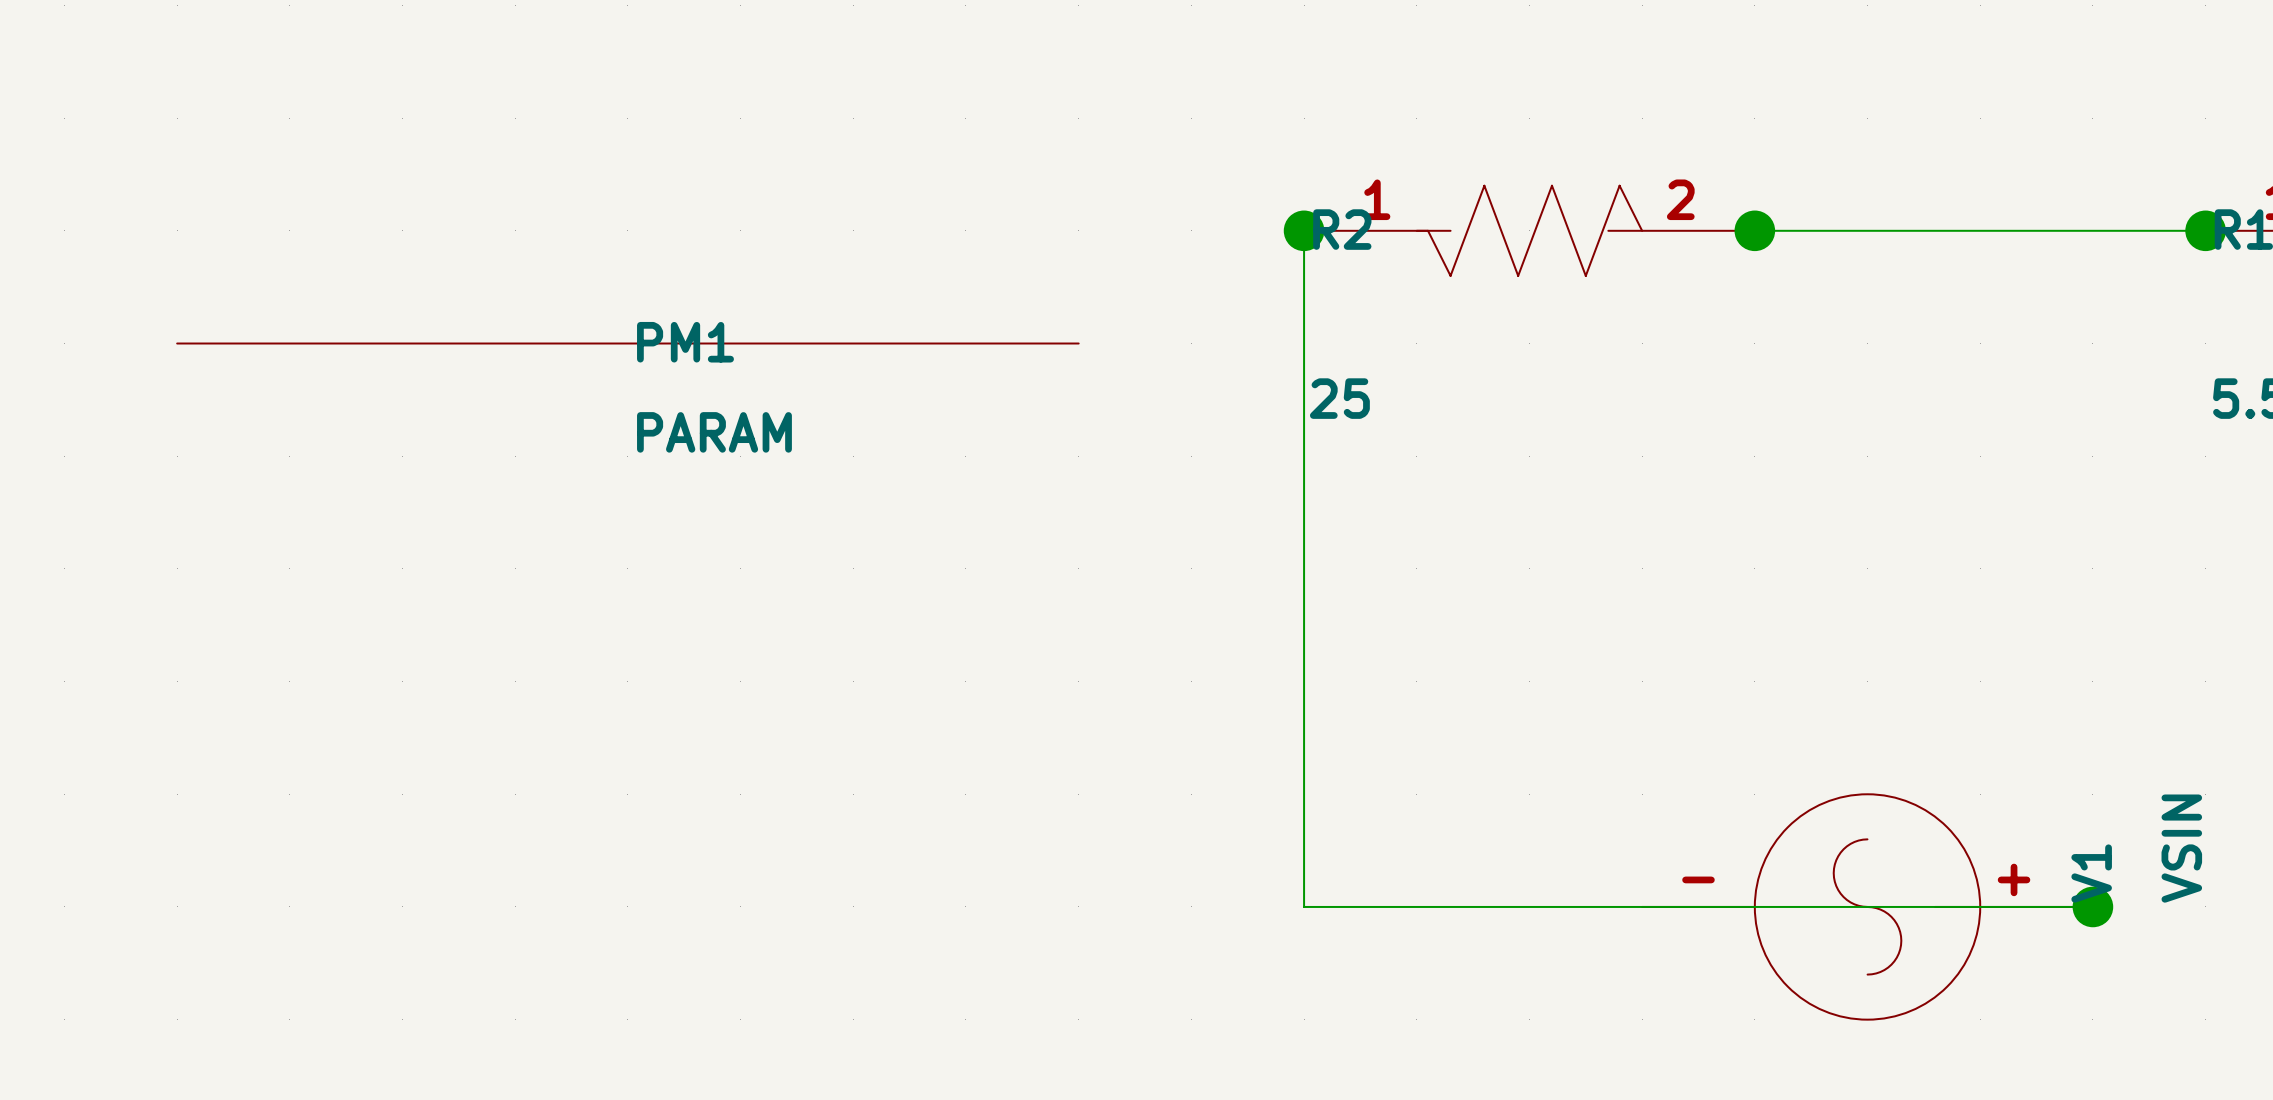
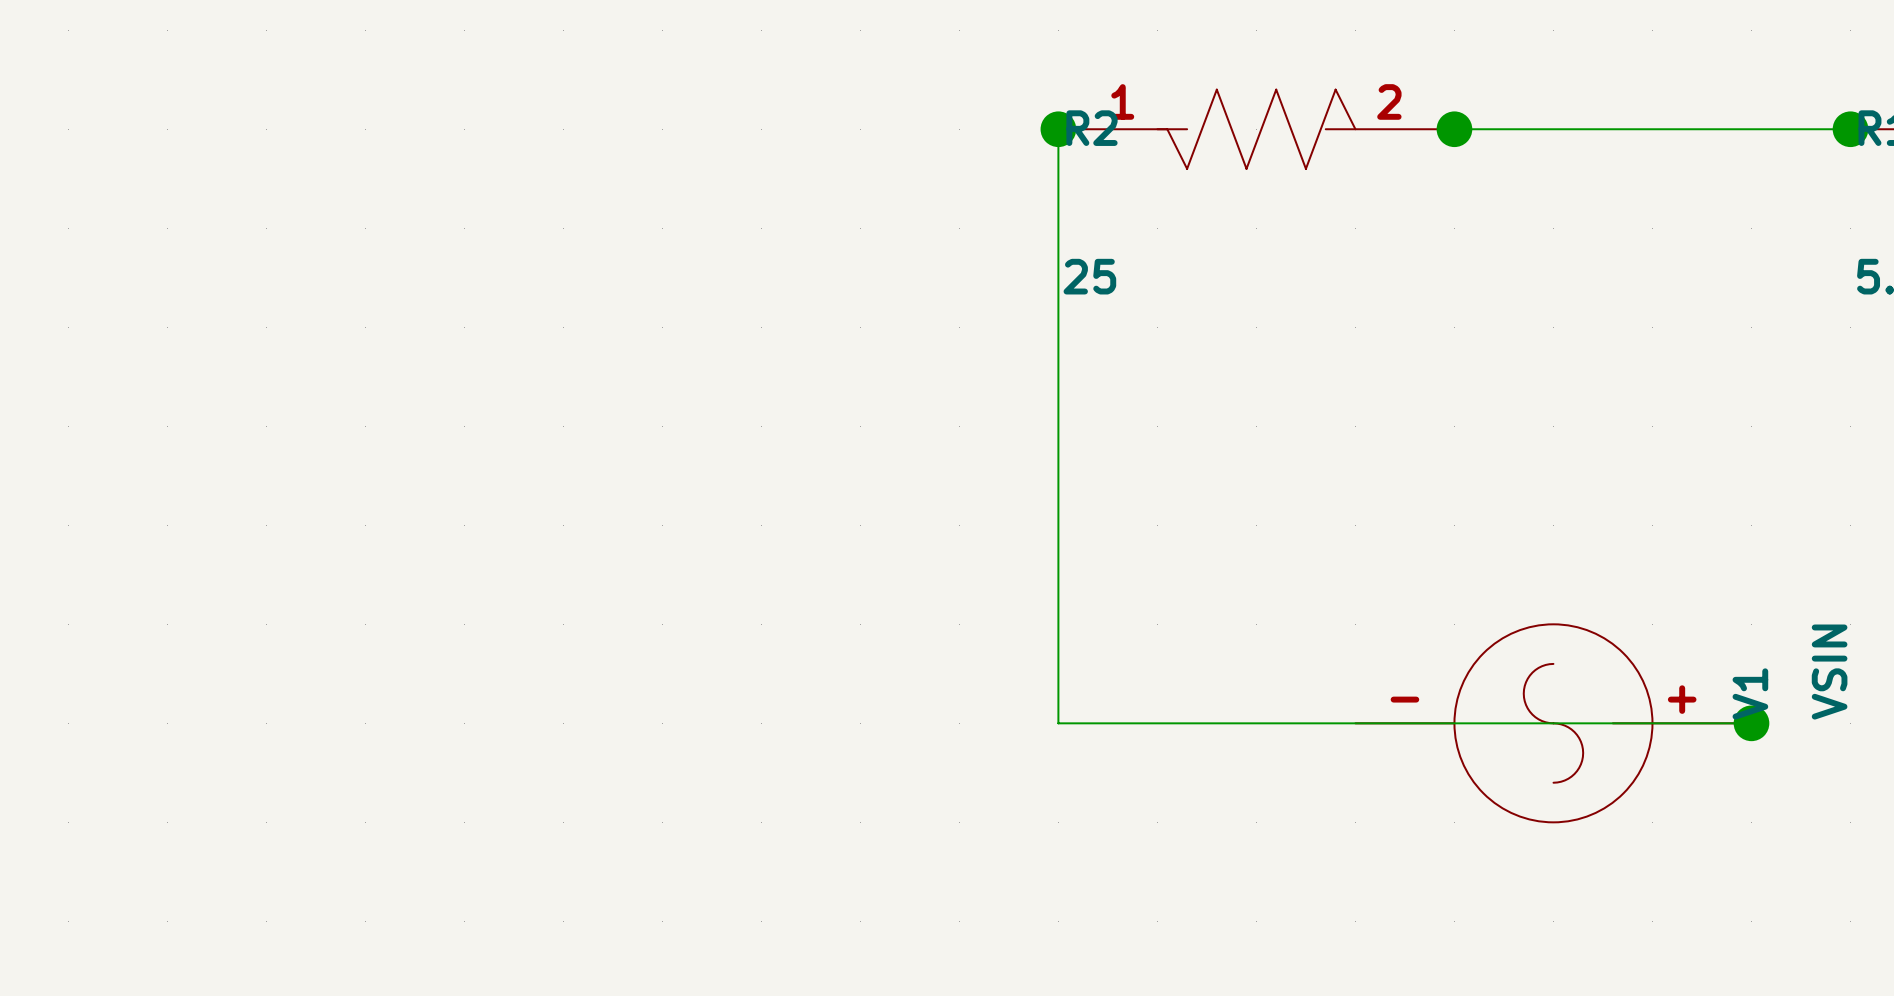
PM1: PARAM (627, 343) -> none

